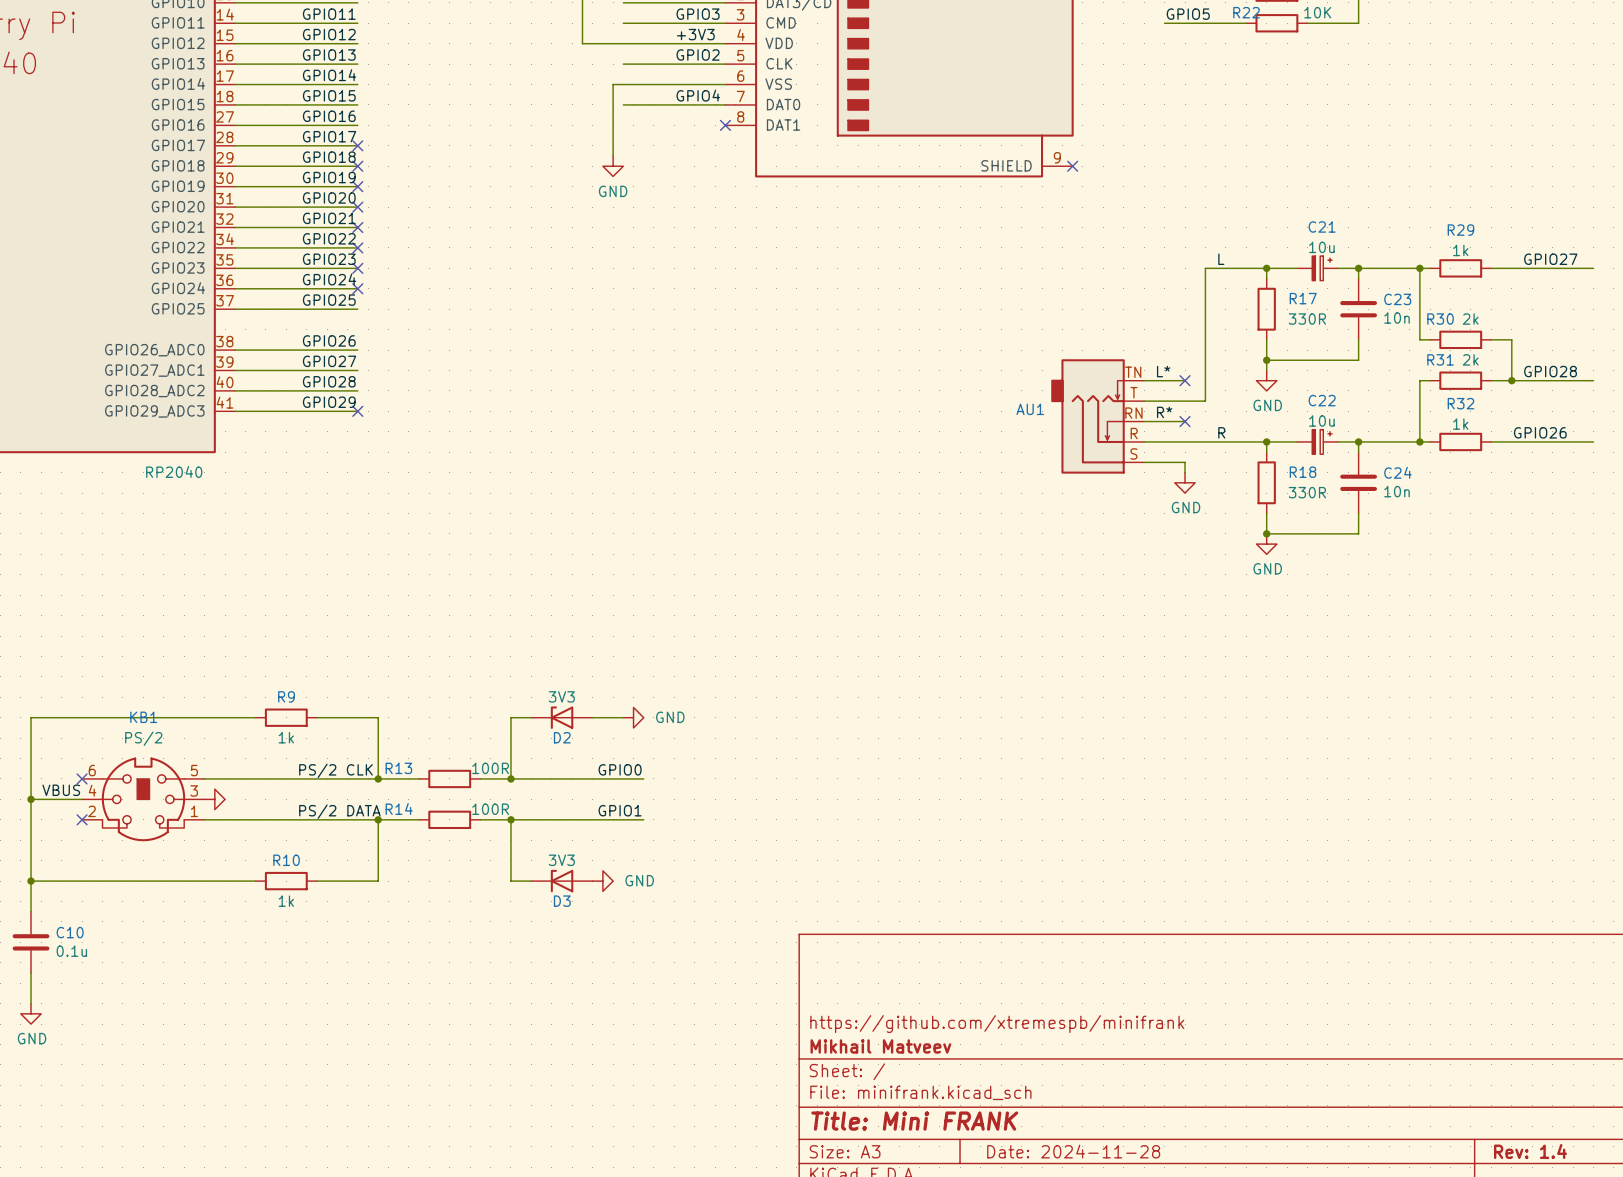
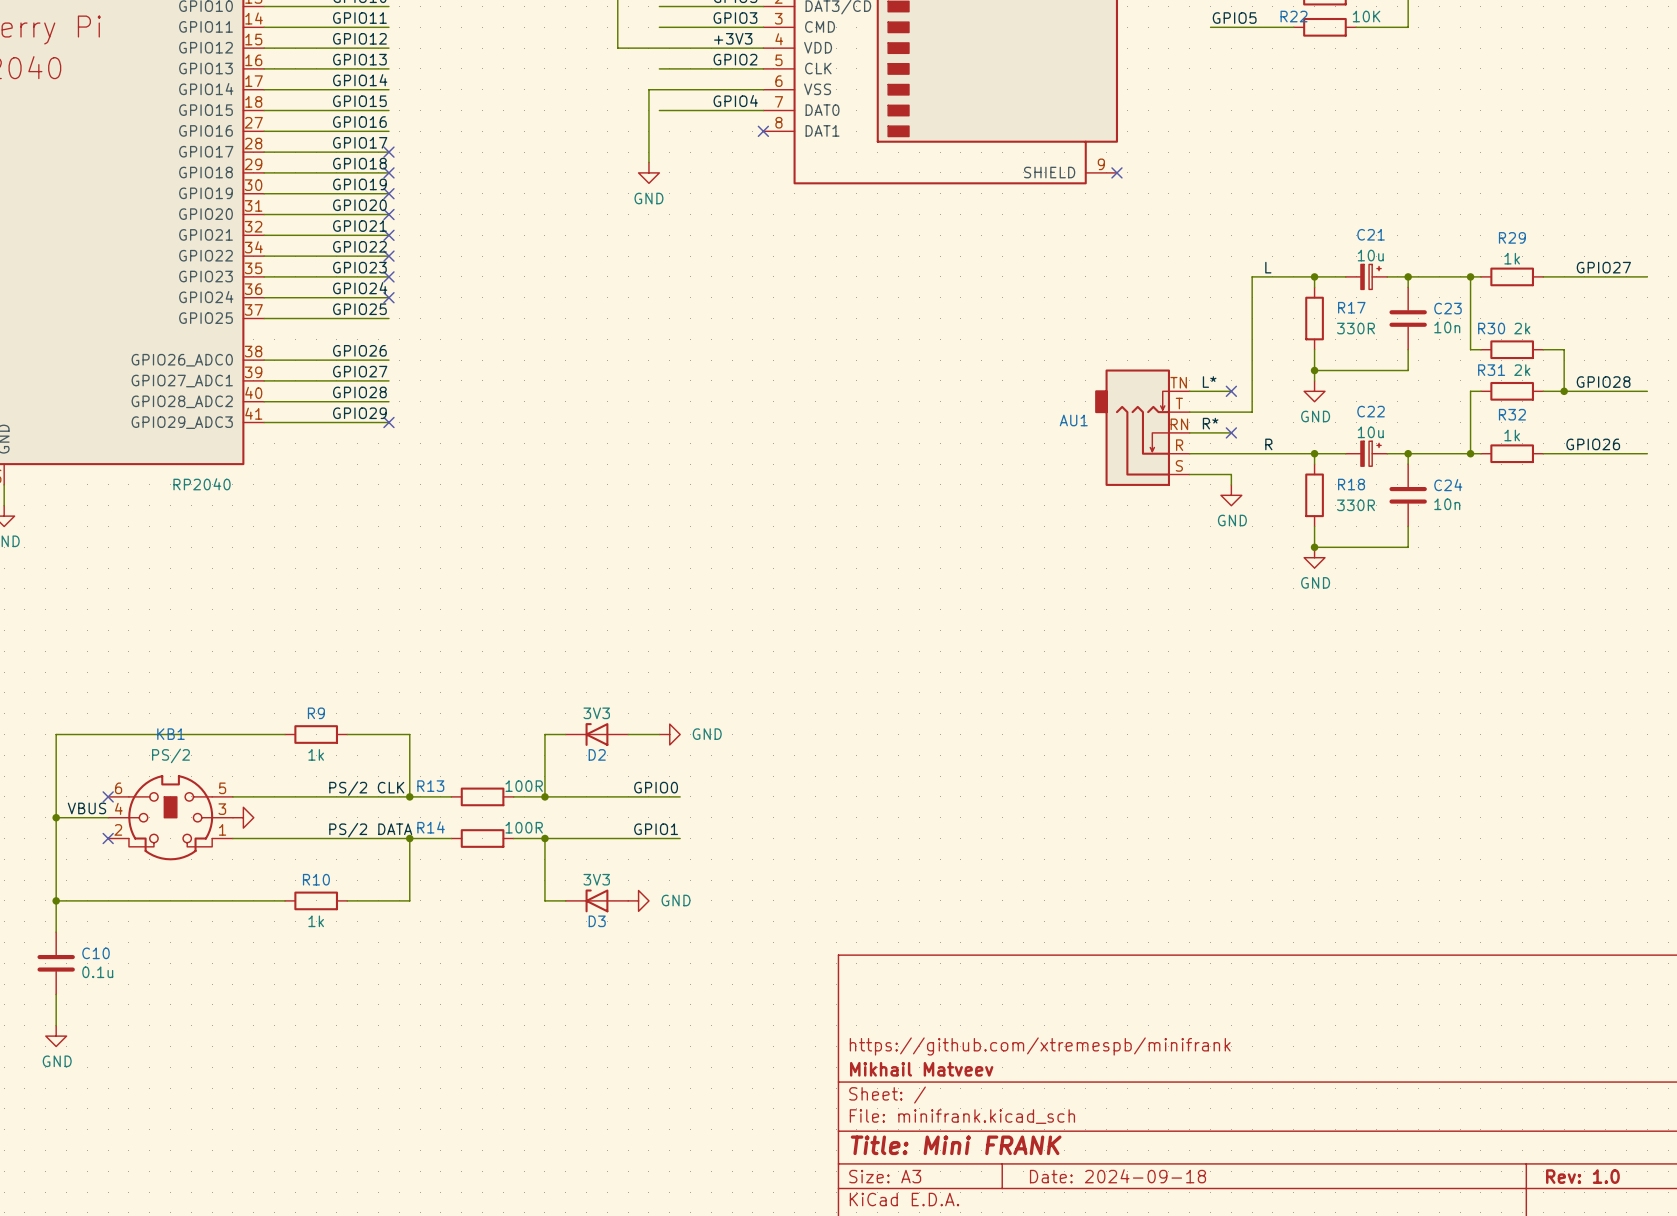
title block: Date: 2024-11-28 (1073, 1151) -> Date: 2024-09-18 (1117, 1176)
title block: Rev: 1.4 (1530, 1151) -> Rev: 1.0 (1582, 1176)

